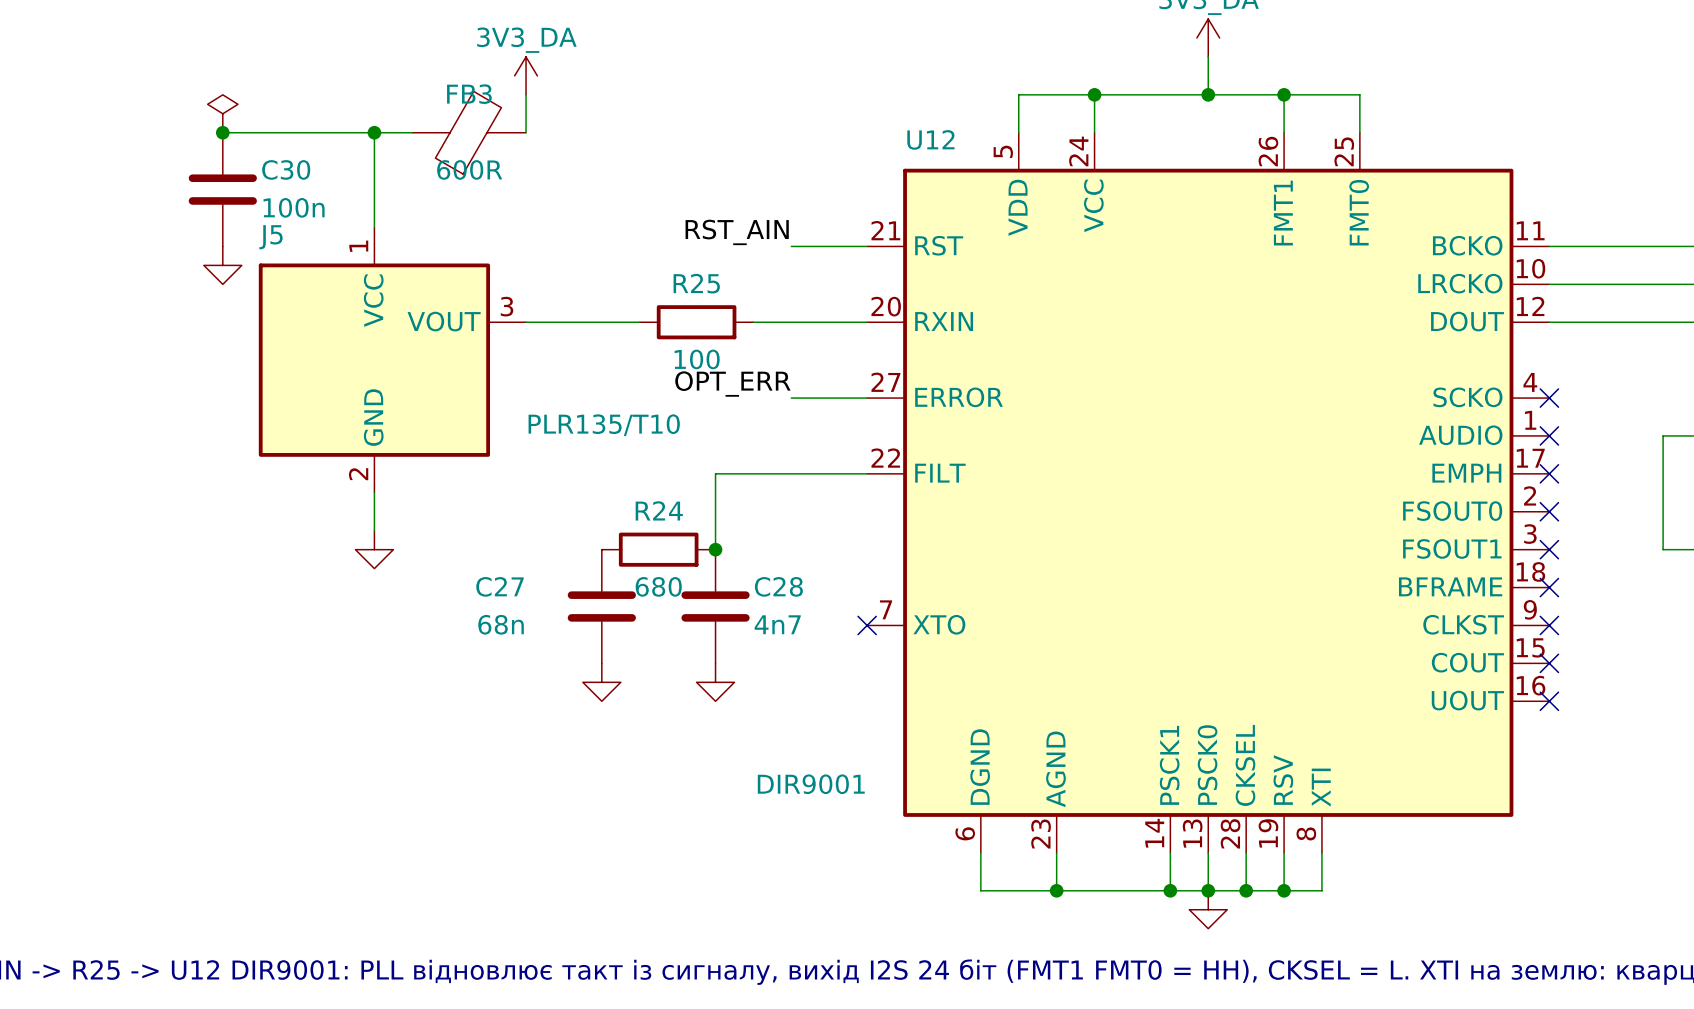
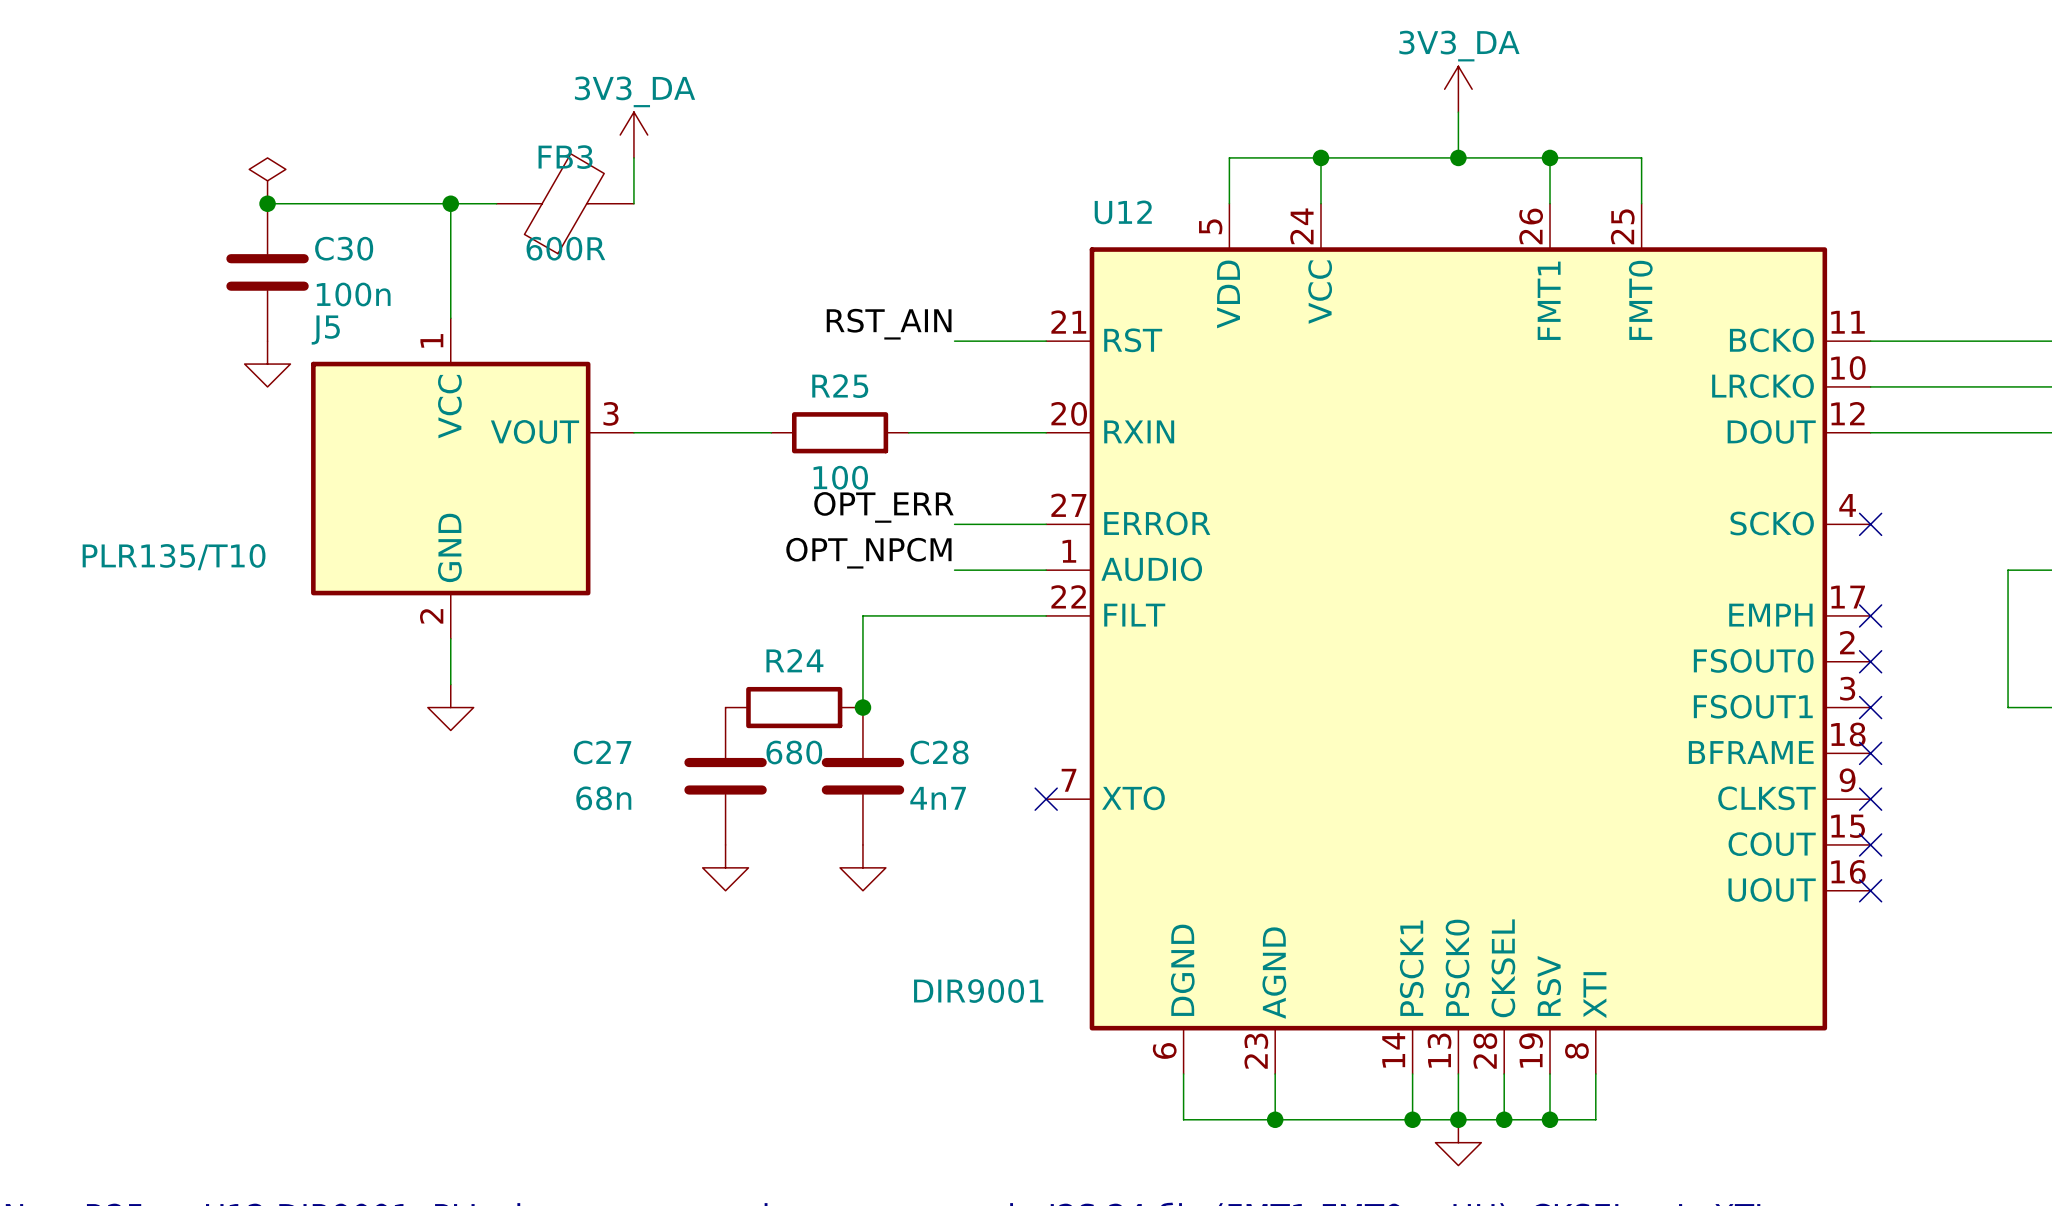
U12 symbol: [867, 132, 1550, 853] -> [1046, 203, 1871, 1074]
label: none -> OPT_NPCM (868, 553)
J5 value position: PLR135/T10 (604, 425) -> PLR135/T10 (174, 557)
wire: none -> (954, 570) (1046, 570)
no-connect mark: (1549, 435) -> none

